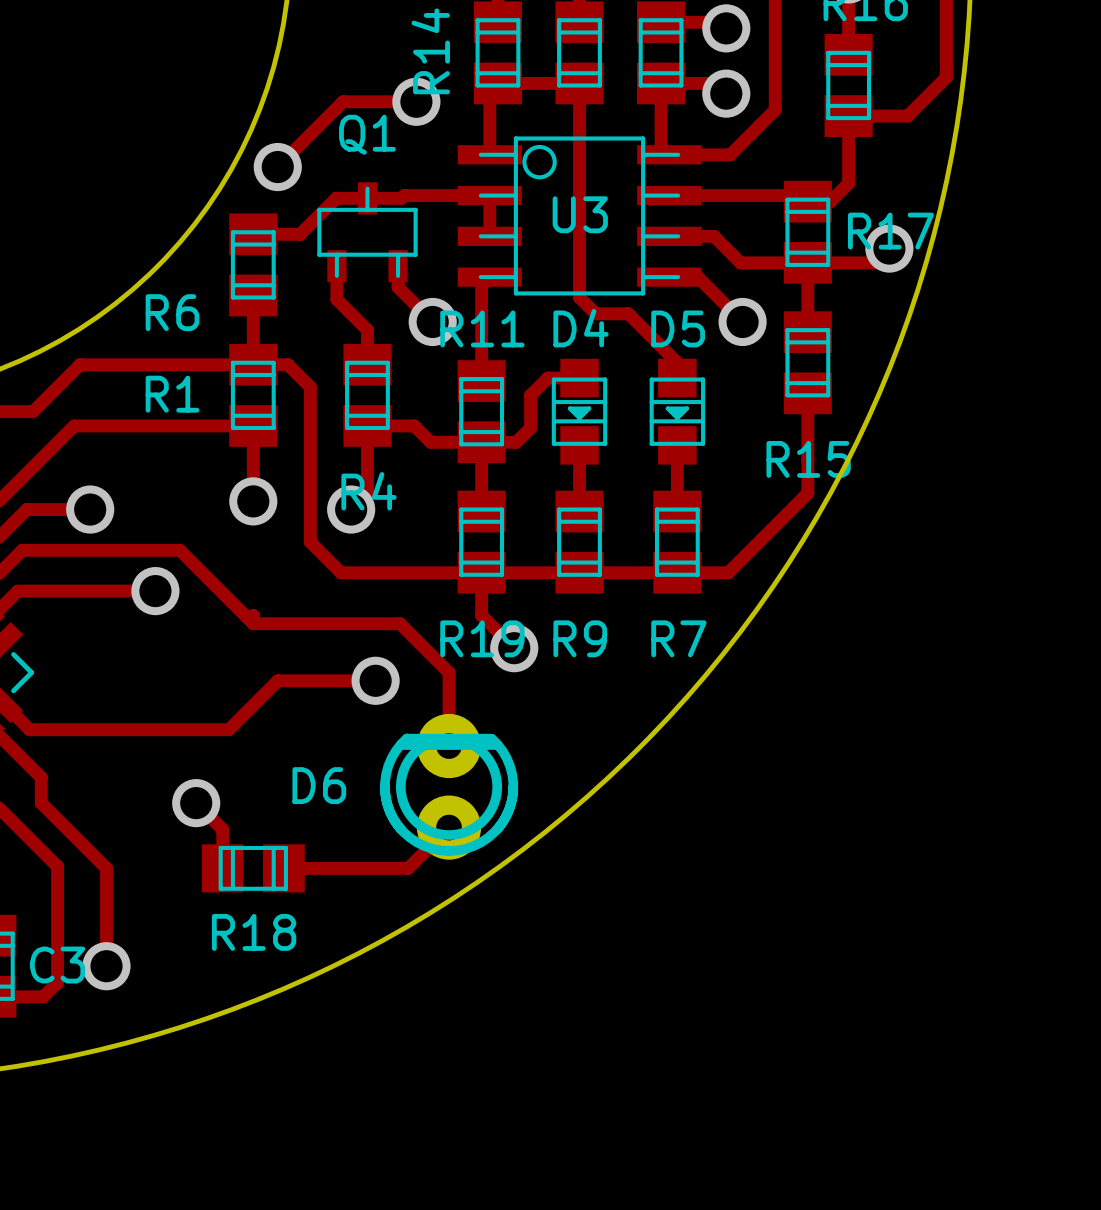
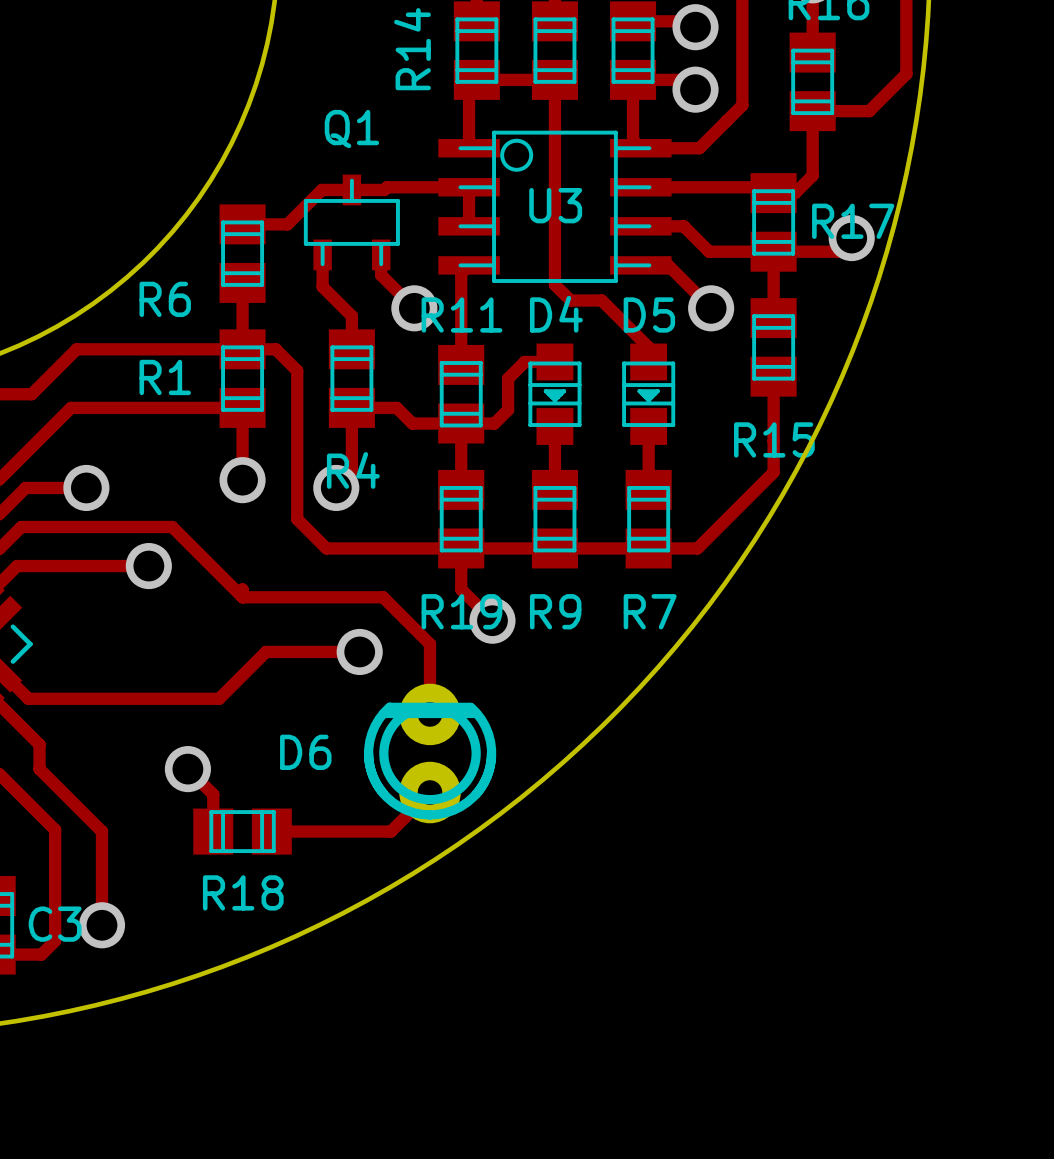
track: (416, 101) (343, 101) (277, 167) -> none
via: (416, 101) -> none
via: (277, 167) -> none

